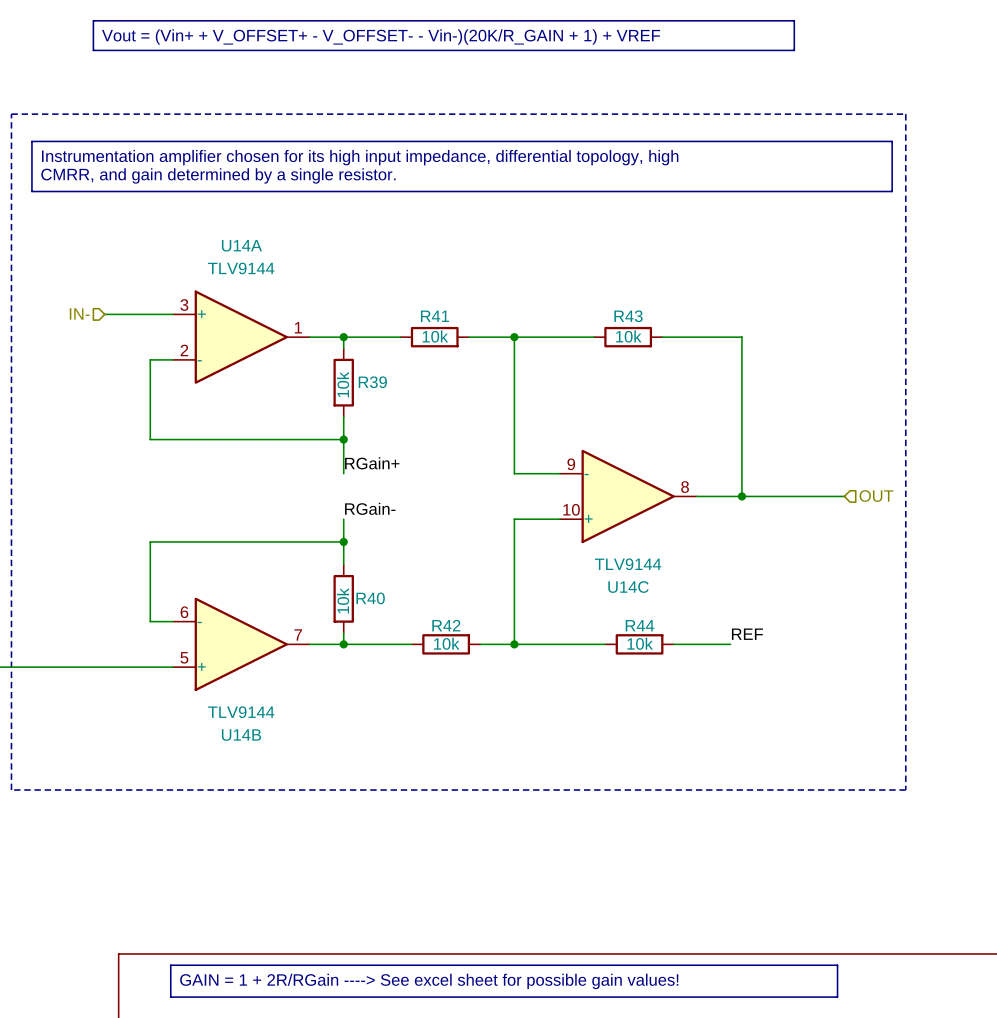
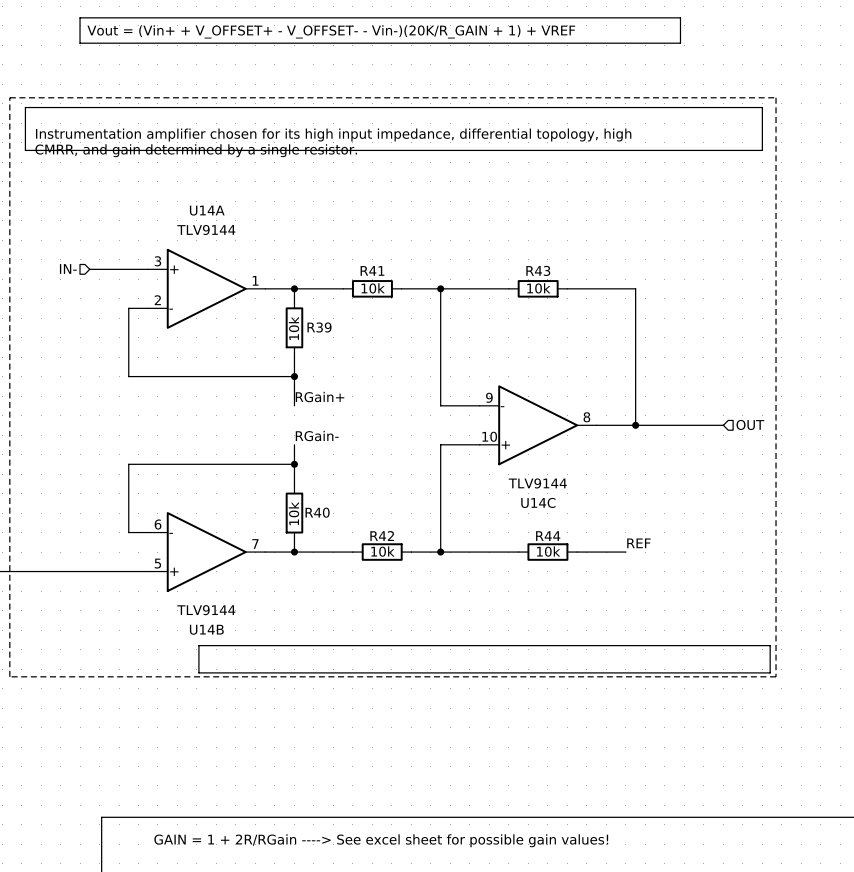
line: (31, 141) (892, 141) (892, 191) (31, 191) (31, 141) -> (25, 107) (762, 107) (762, 150) (25, 150) (25, 107)
line: (170, 965) (837, 965) (837, 997) (170, 997) (170, 965) -> (198, 645) (770, 645) (770, 672) (198, 672) (198, 645)

